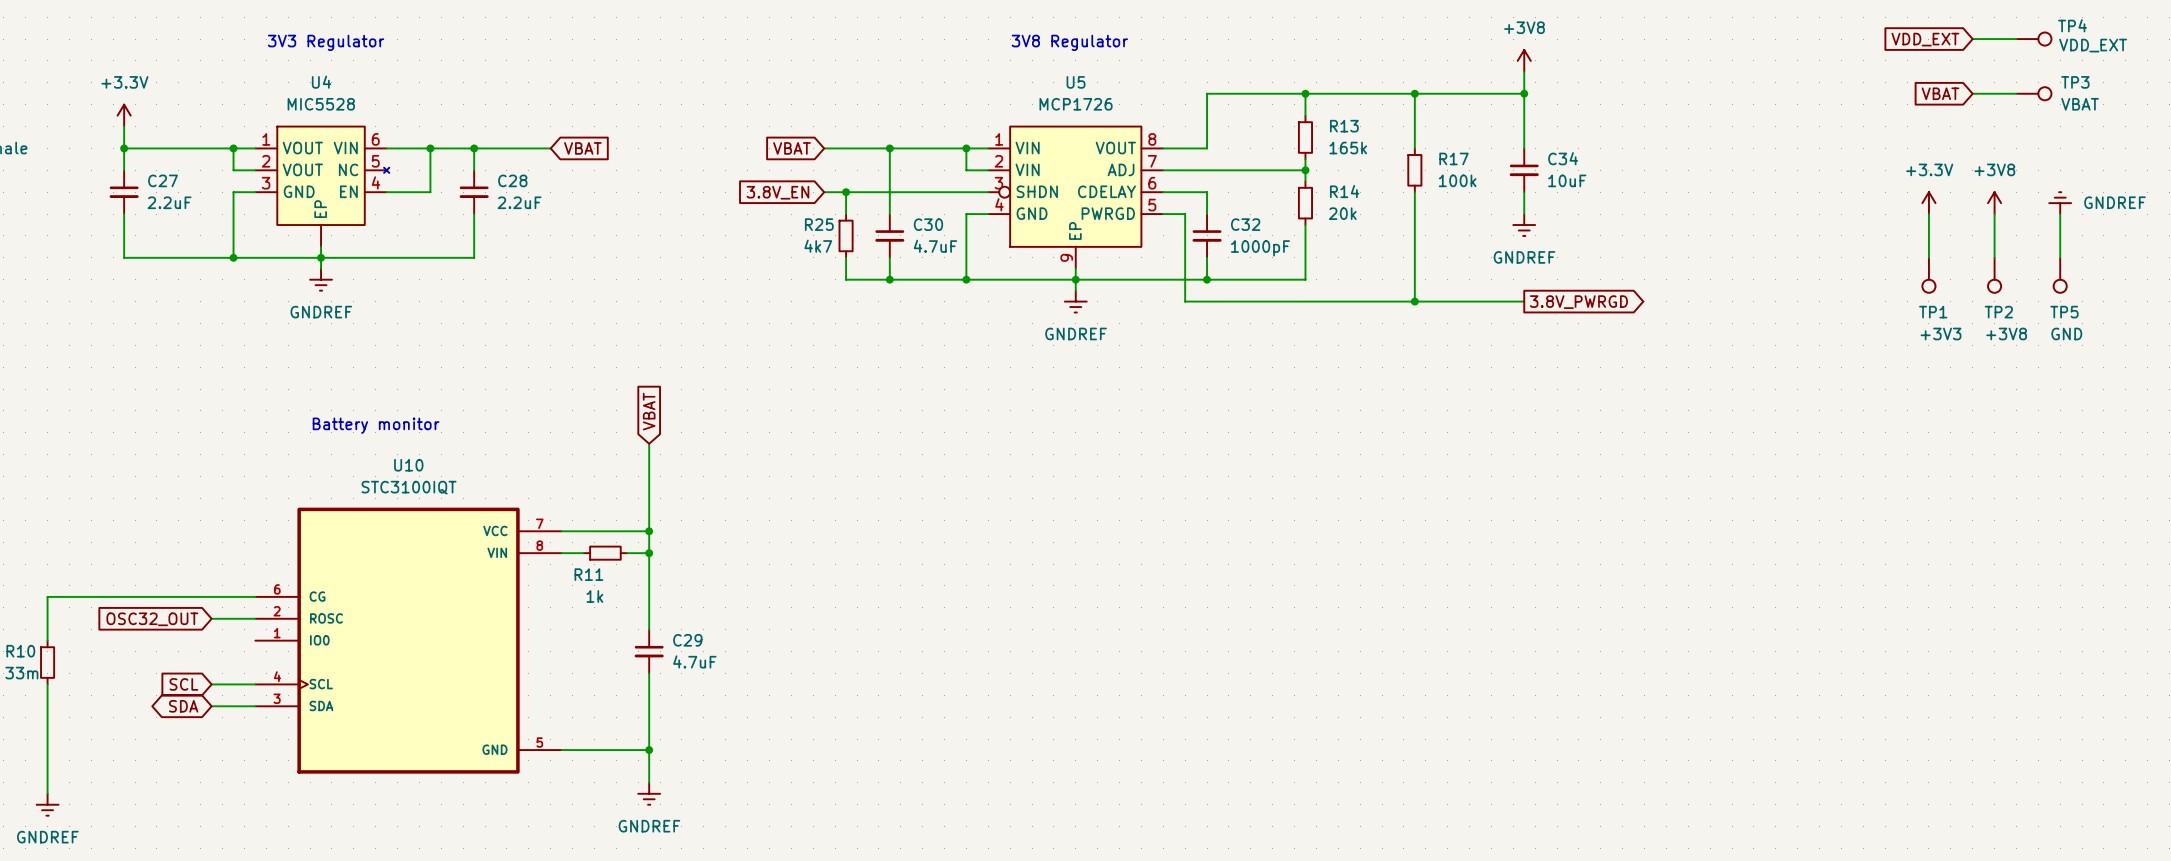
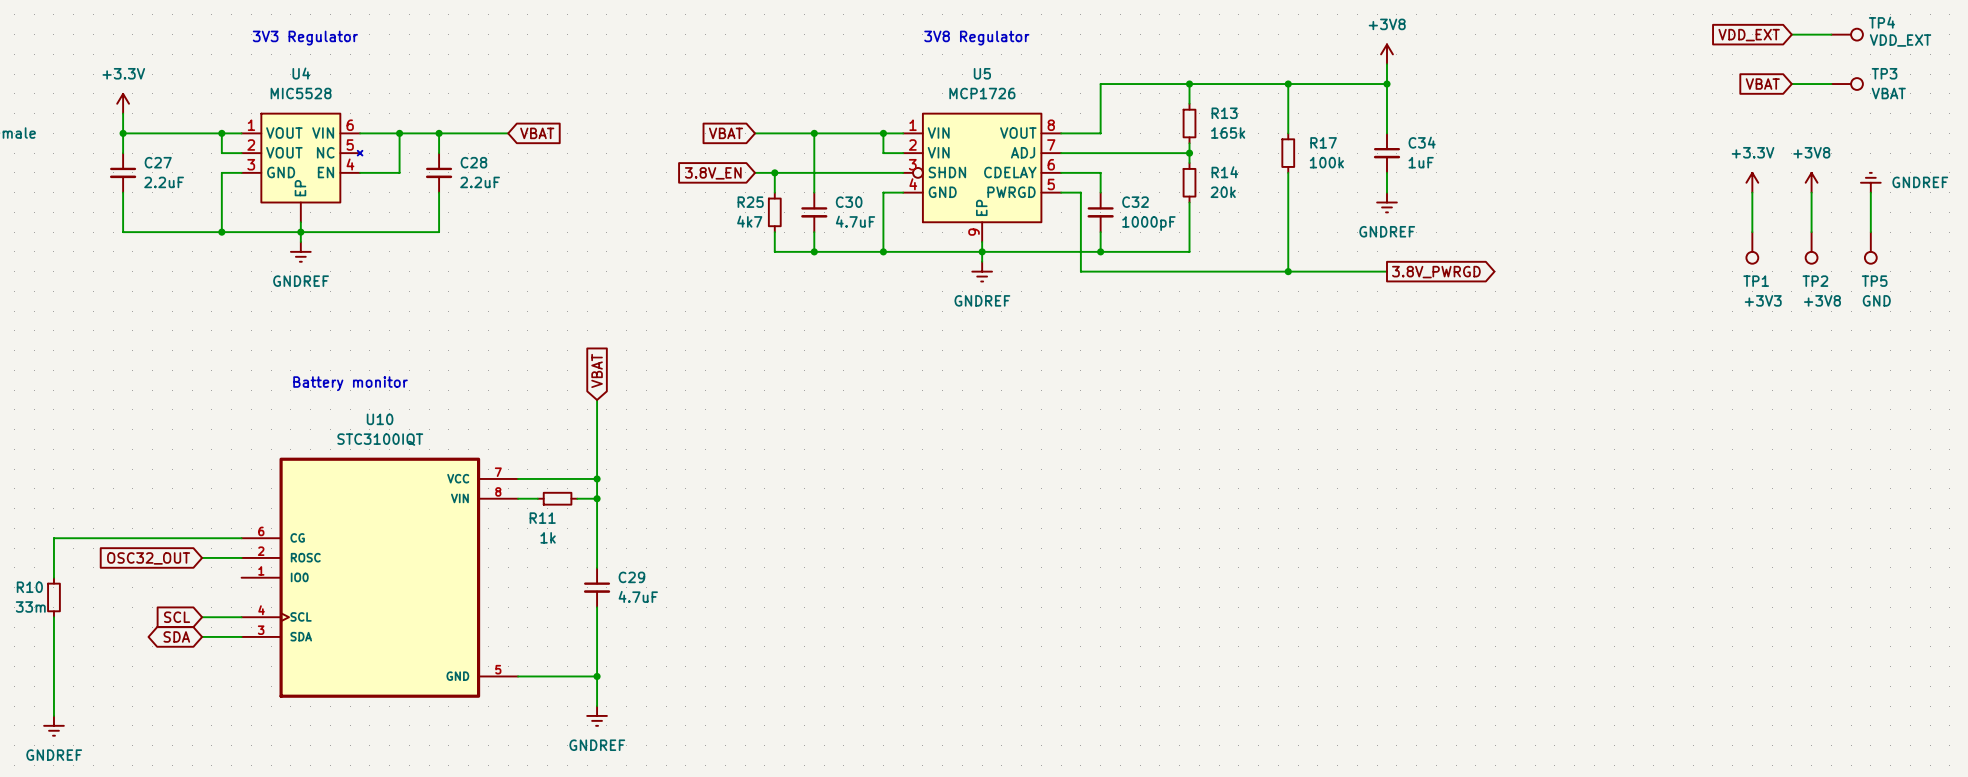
C34 value: 10uF (1567, 180) -> 1uF (1421, 162)

